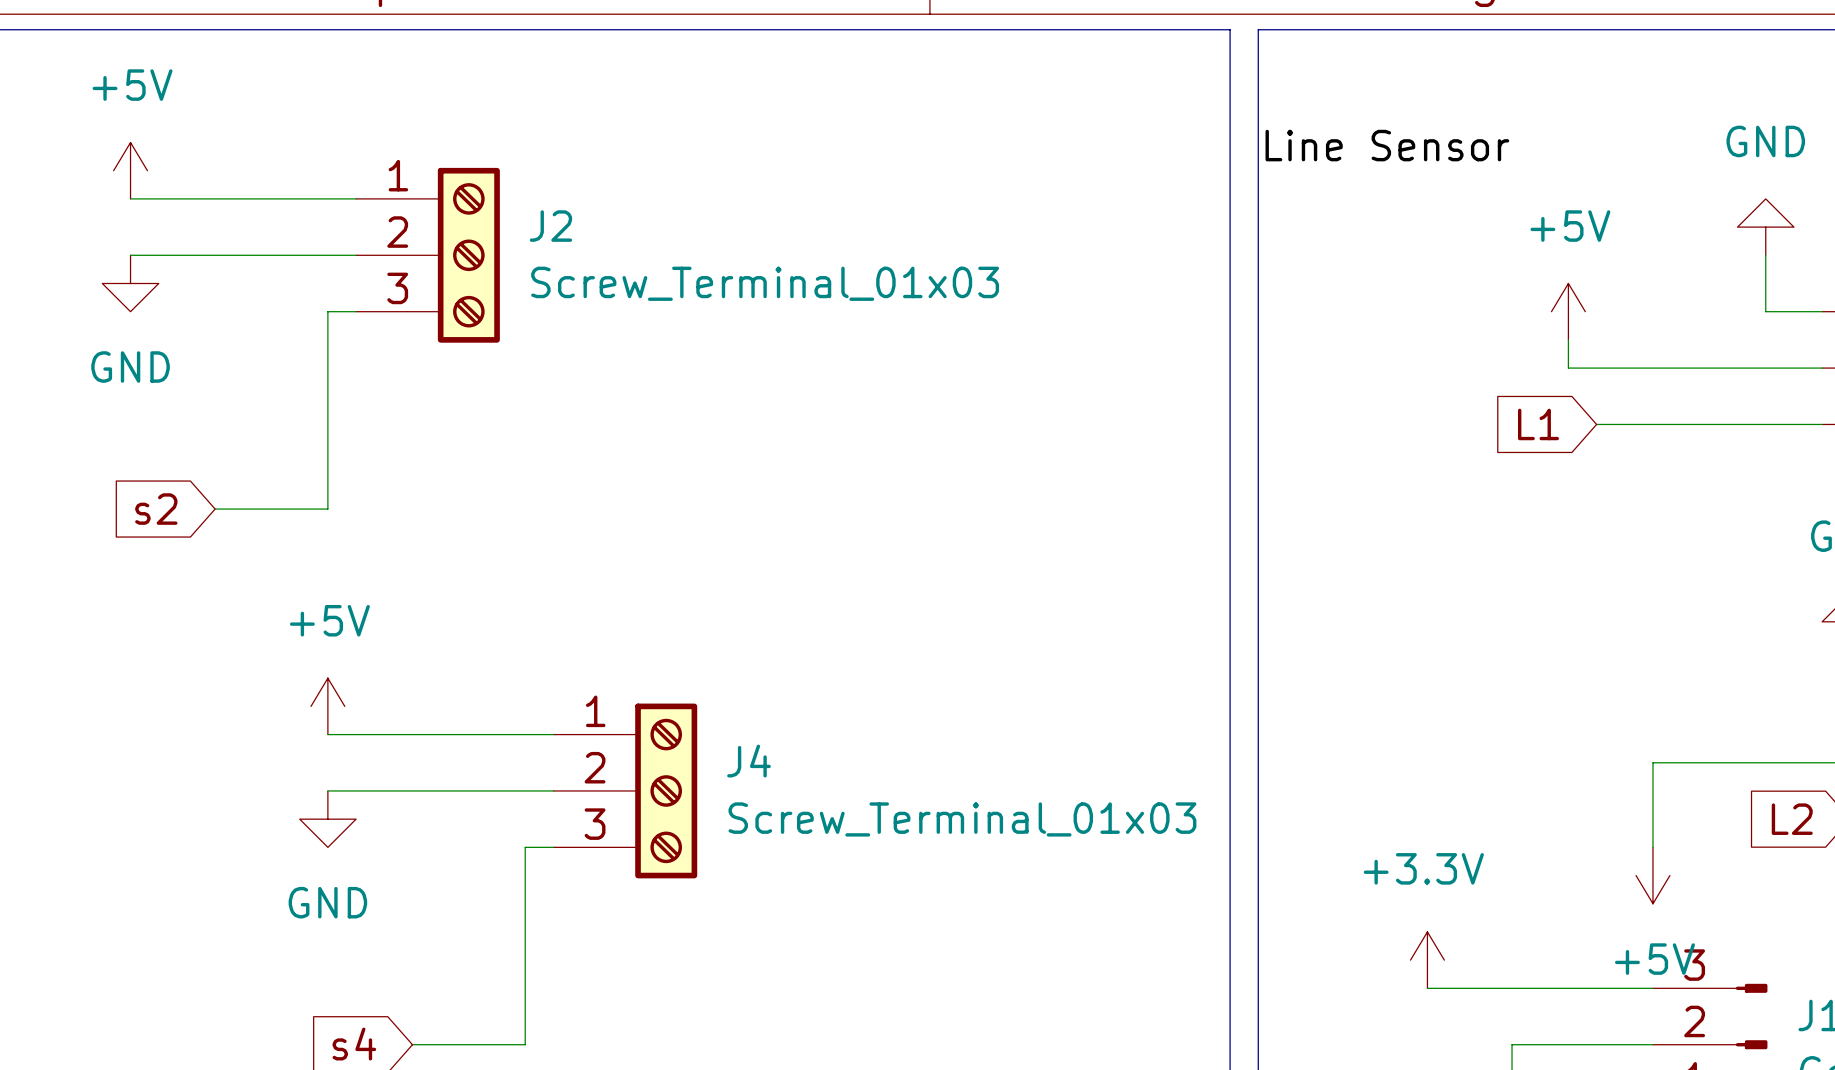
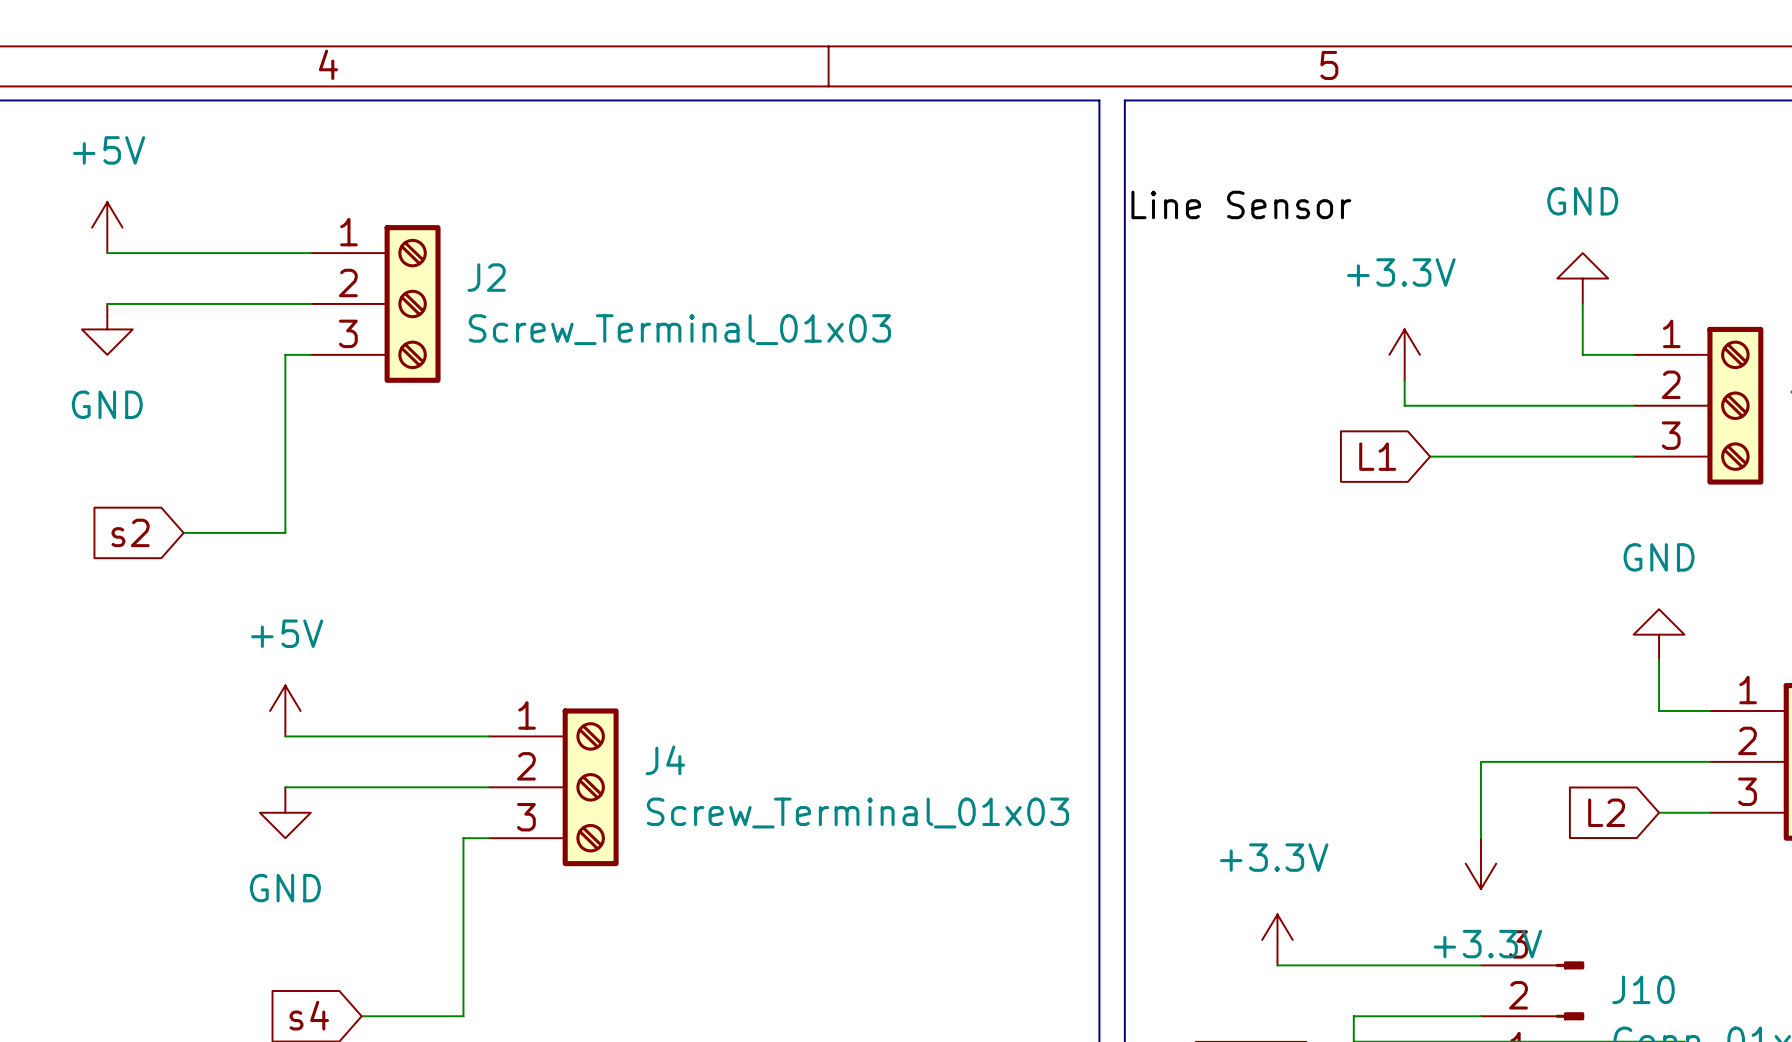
power symbol: +5V (1568, 311) -> +3.3V (1404, 354)
power symbol: +5V (1652, 875) -> +3.3V (1480, 863)

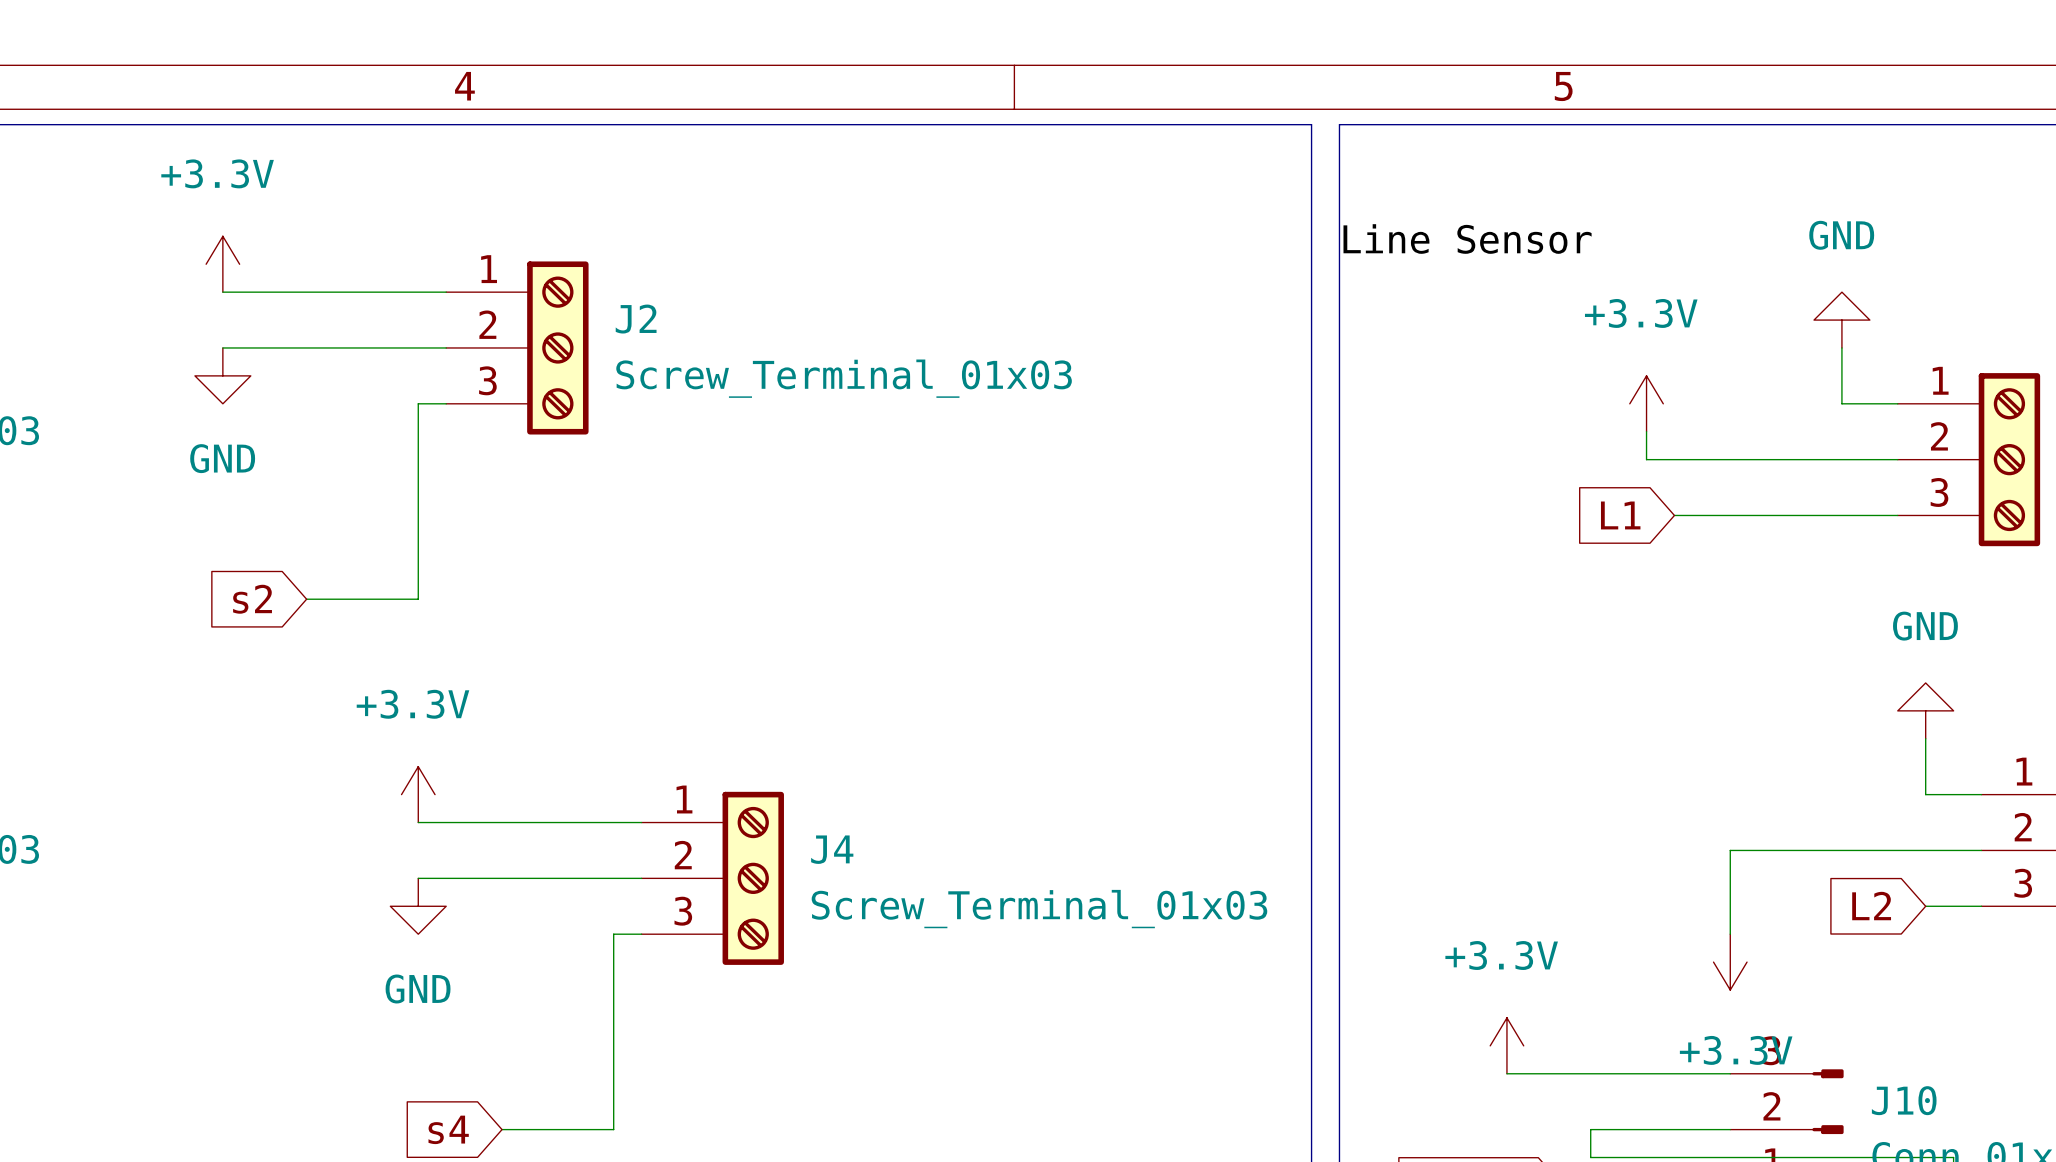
power symbol: +5V (107, 227) -> +3.3V (222, 264)
power symbol: +5V (285, 711) -> +3.3V (418, 794)

